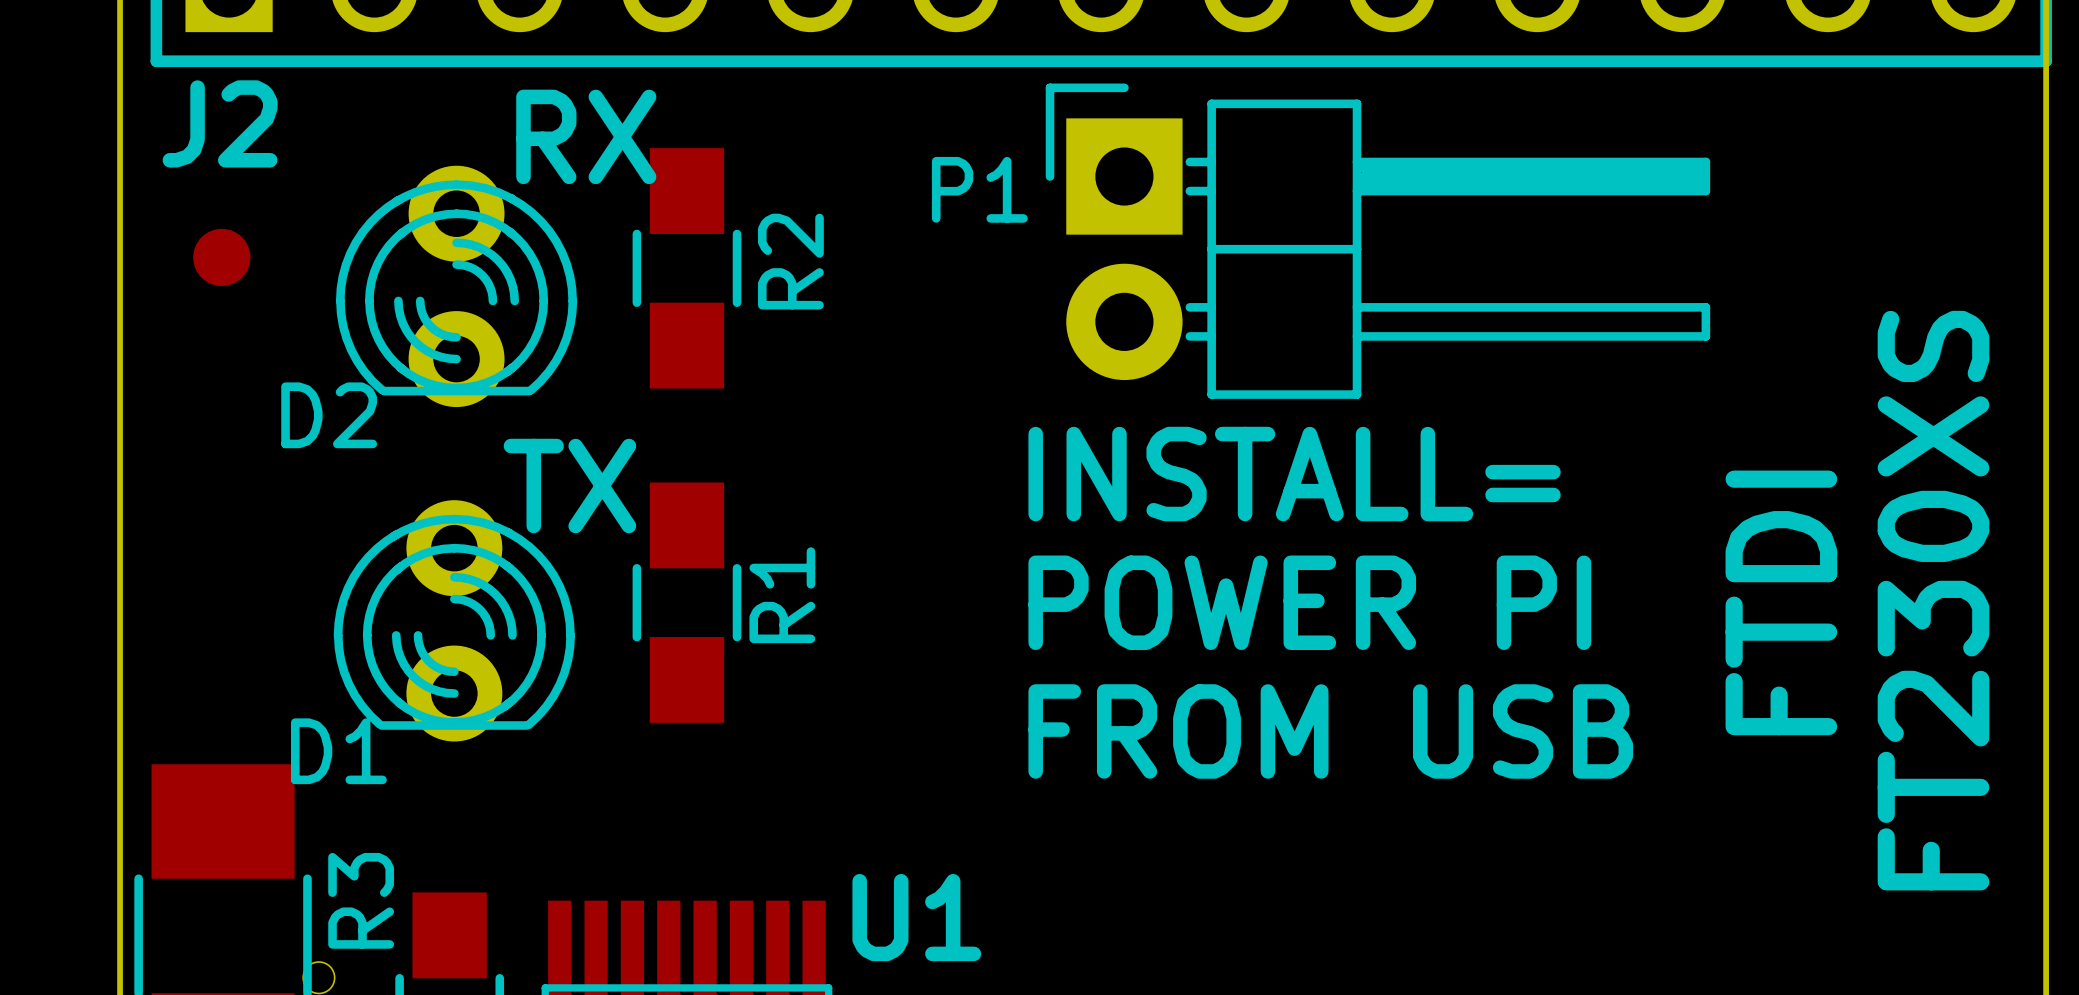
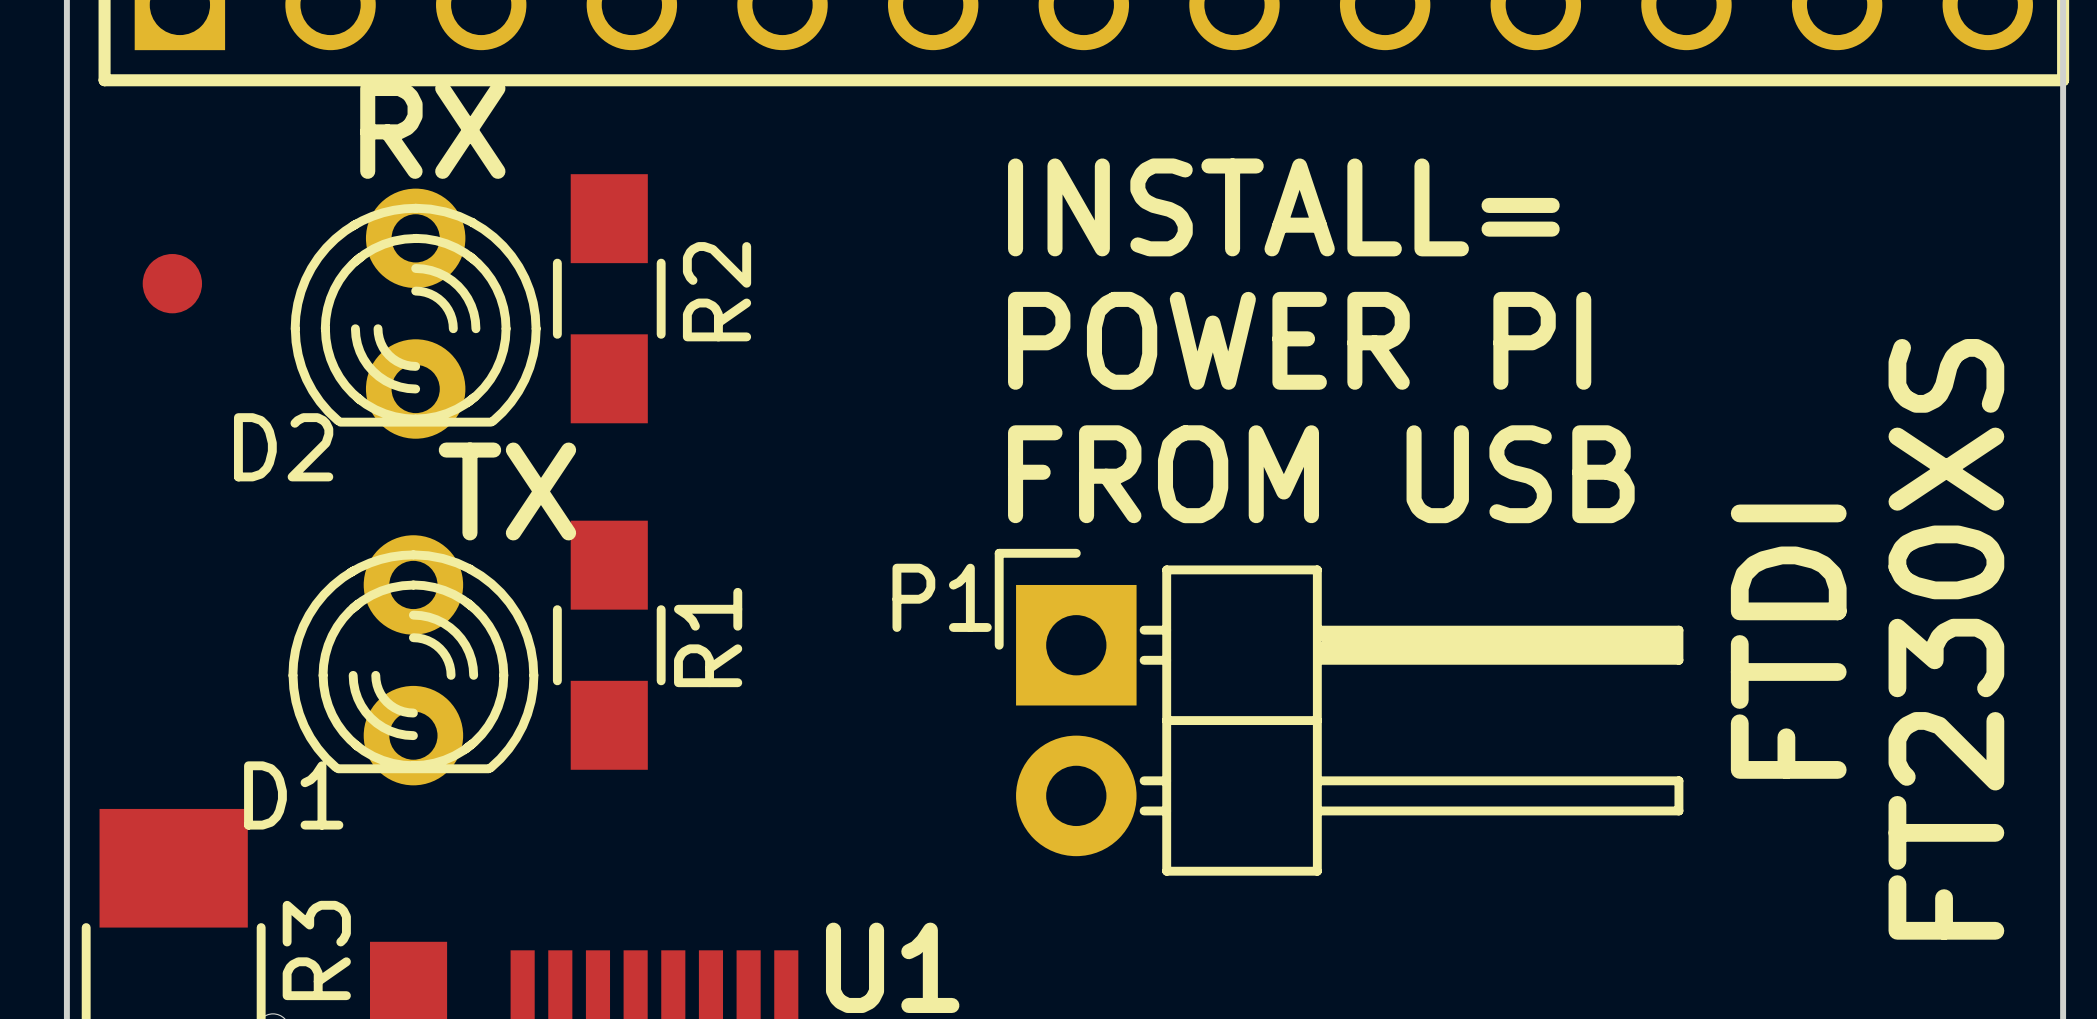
J2 name: J2 (220, 123) -> none
text position: RX (586, 136) -> RX (432, 129)
P1 name position: P1 (979, 189) -> P1 (942, 597)
P1 position: (1377, 241) -> (1339, 712)
R2 position: (686, 268) -> (609, 298)
text position: INSTALL= (1294, 474) -> INSTALL= (1283, 207)
text position: TX (569, 486) -> TX (507, 491)
R1 position: (686, 602) -> (609, 645)
text position: POWER PI (1309, 602) -> POWER PI (1299, 340)
text position: FROM USB (1330, 731) -> FROM USB (1321, 474)

